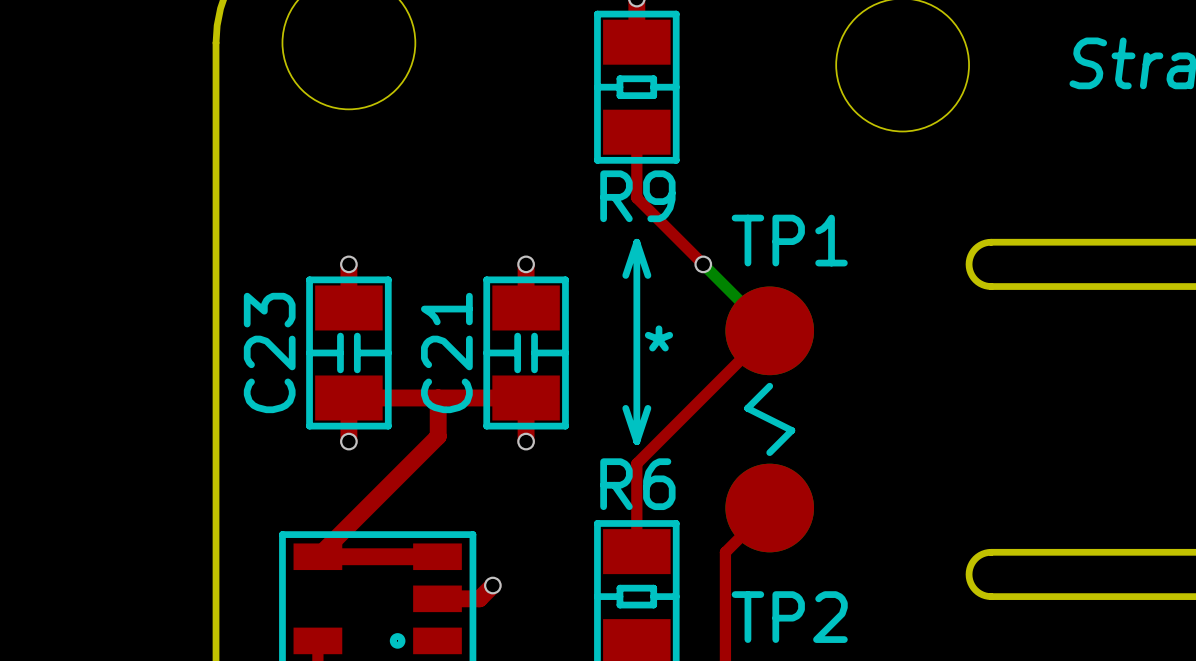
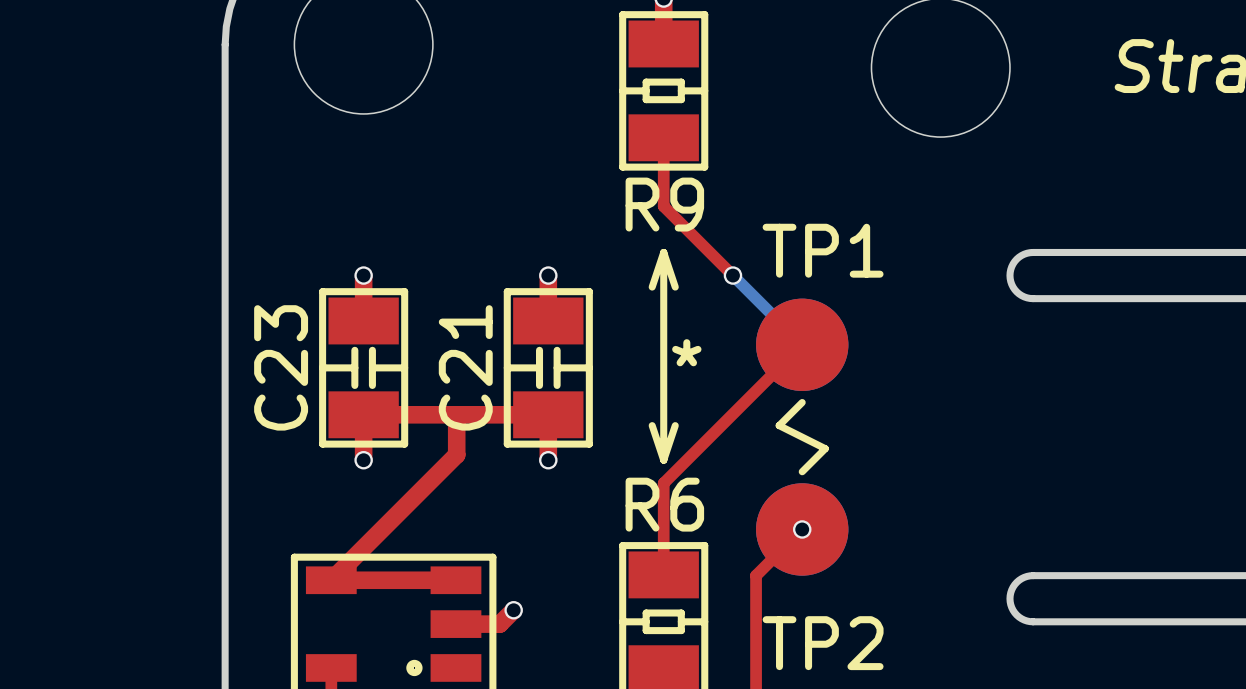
via: none -> (802, 529)

